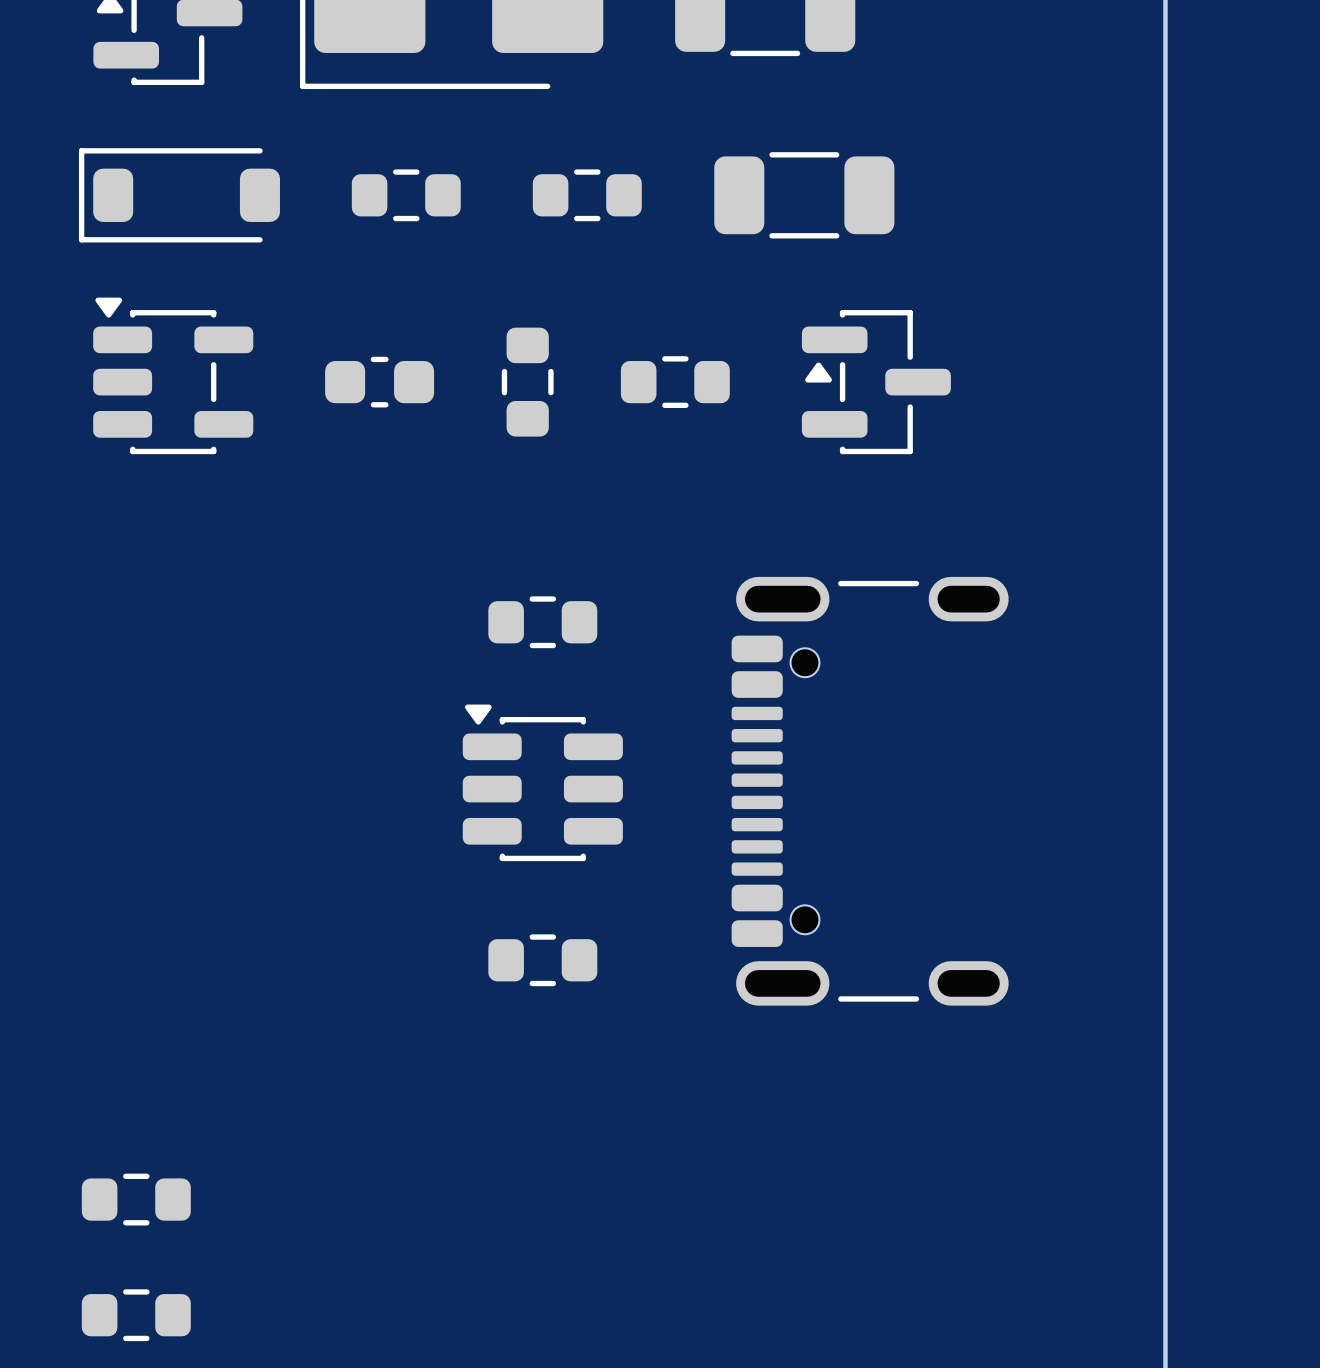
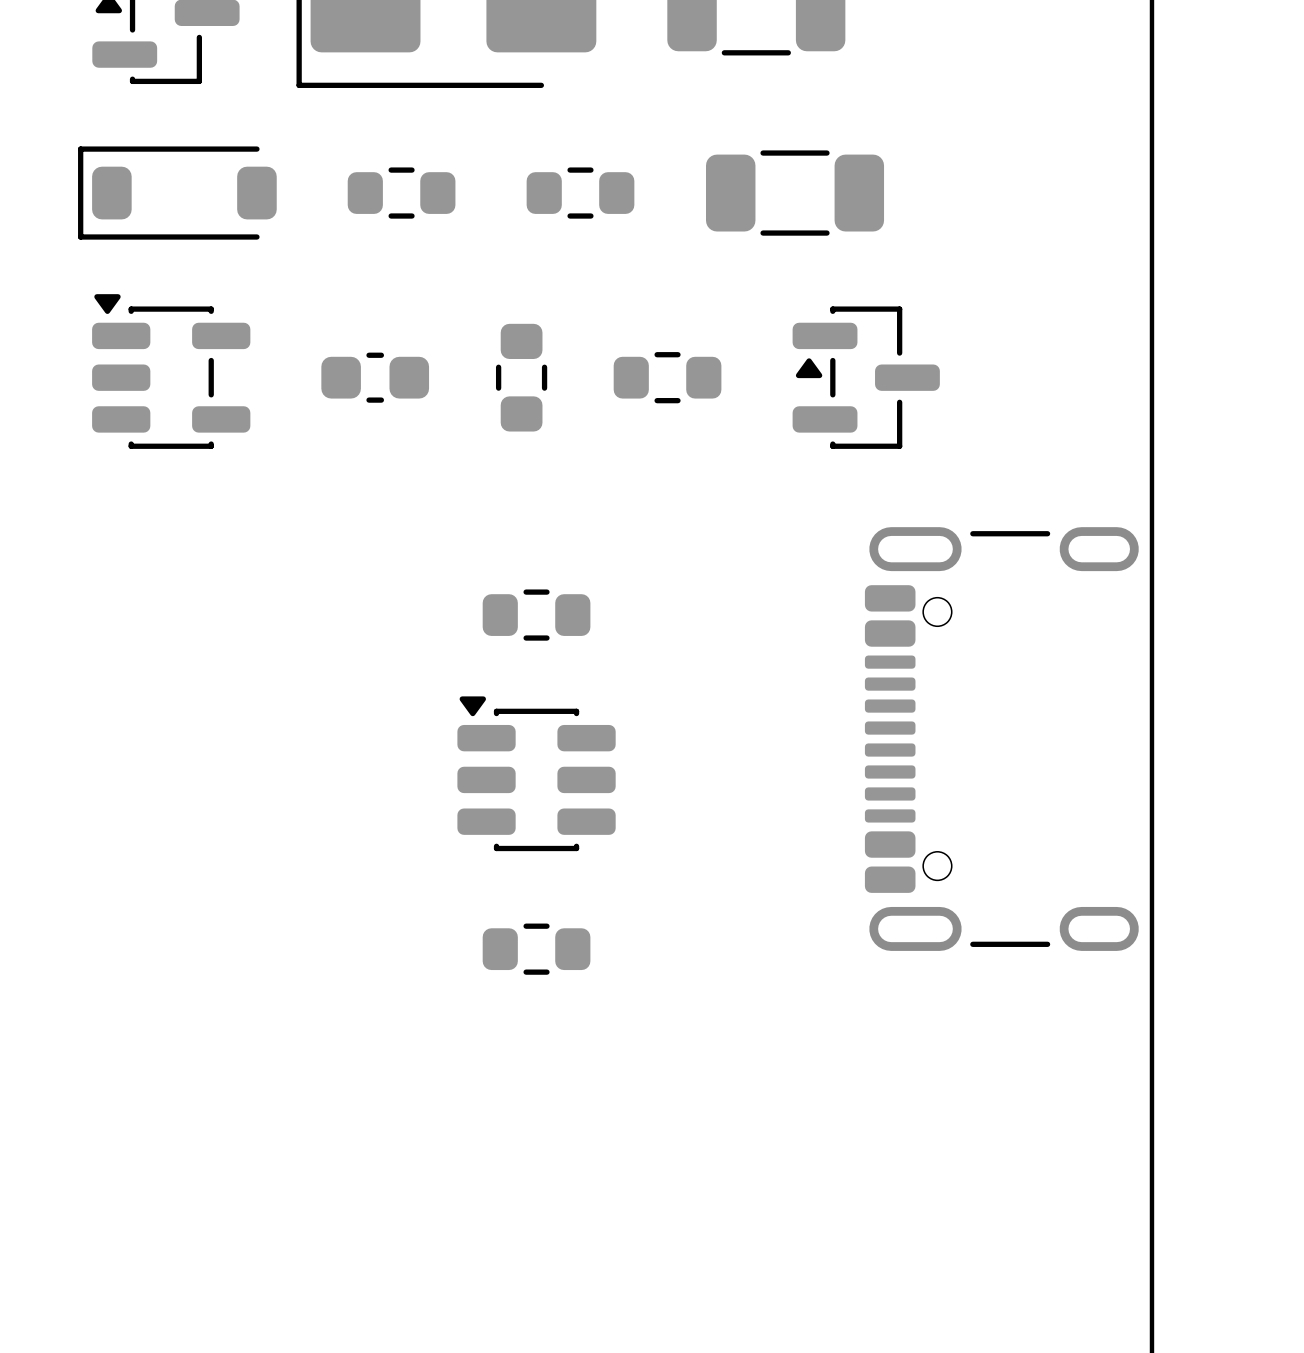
part position: (870, 791) -> (1001, 739)
part: (136, 1199) -> none
part: (136, 1315) -> none

